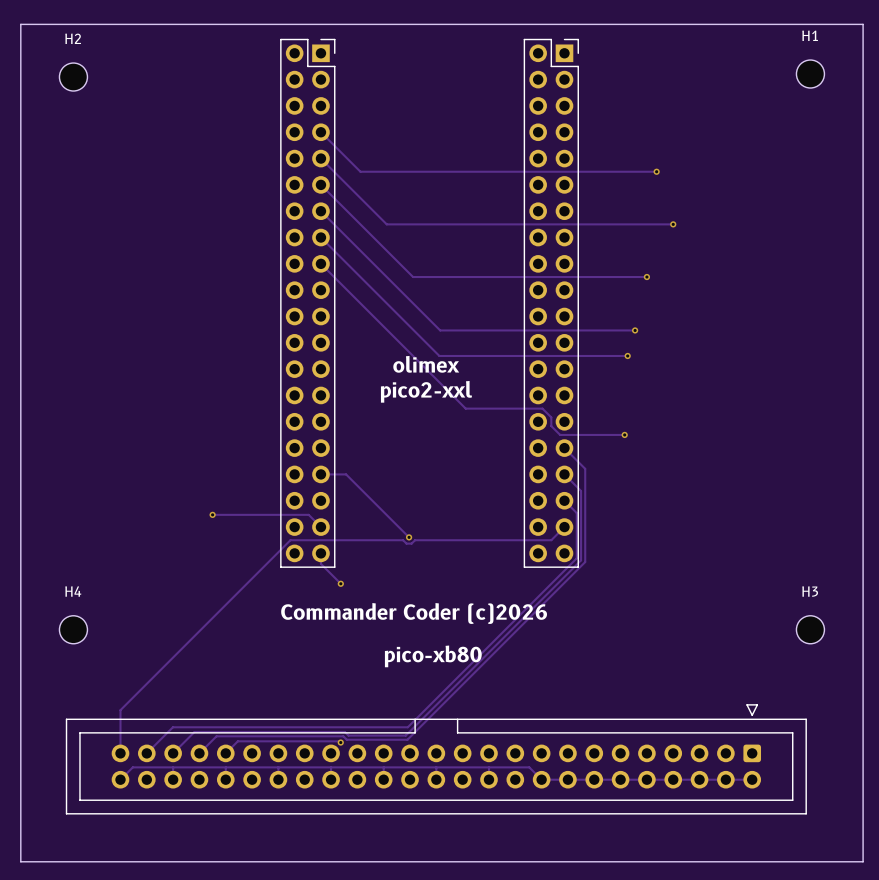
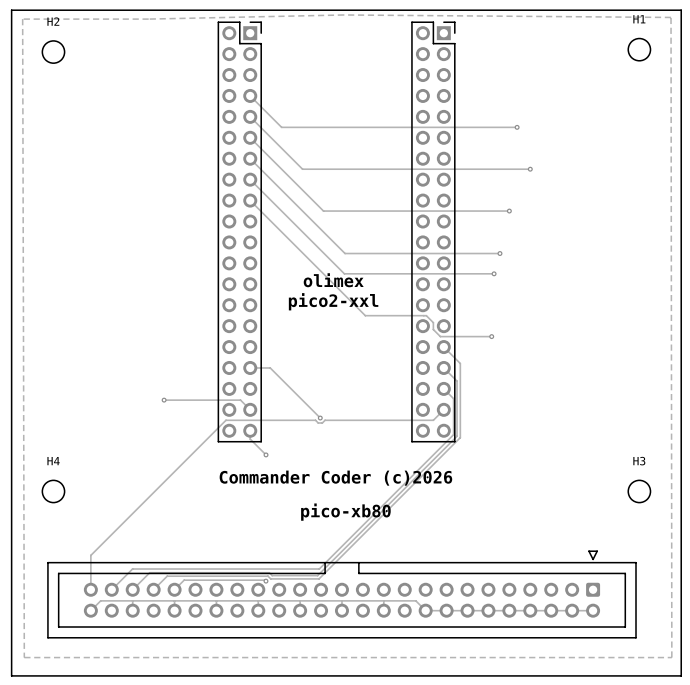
zone outline: none -> (343, 14) (671, 17) (671, 657) (24, 657) (22, 19) (148, 19) (343, 14)

